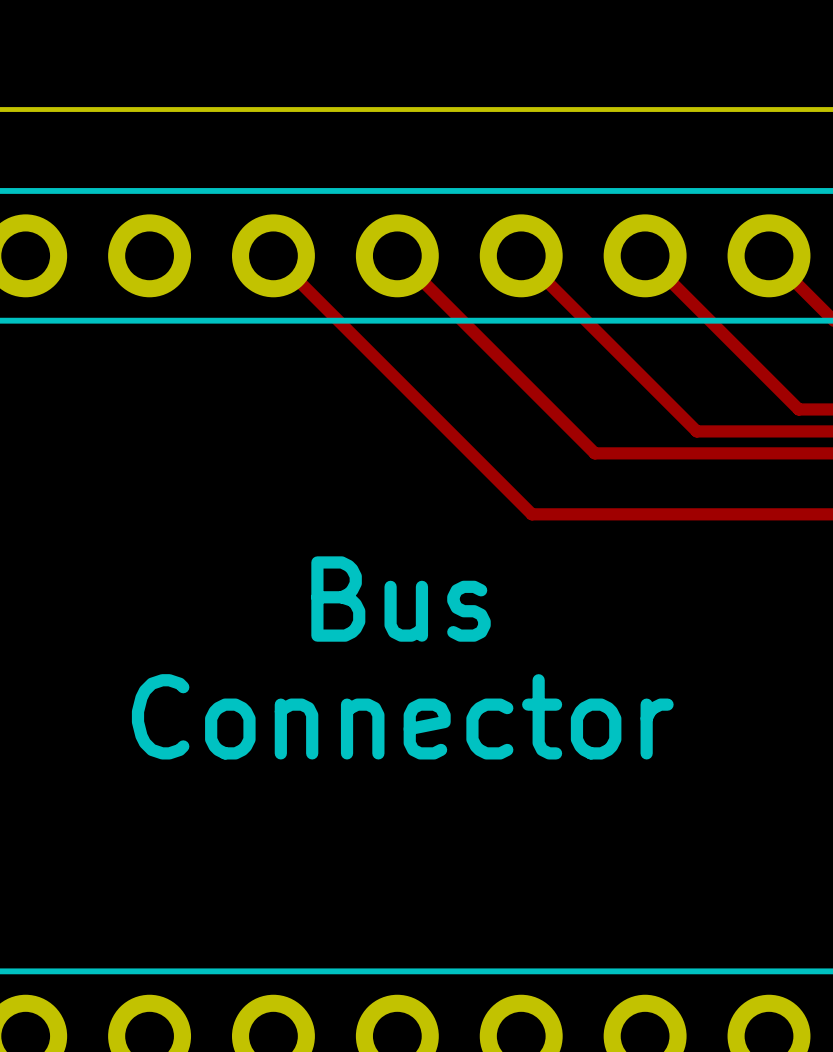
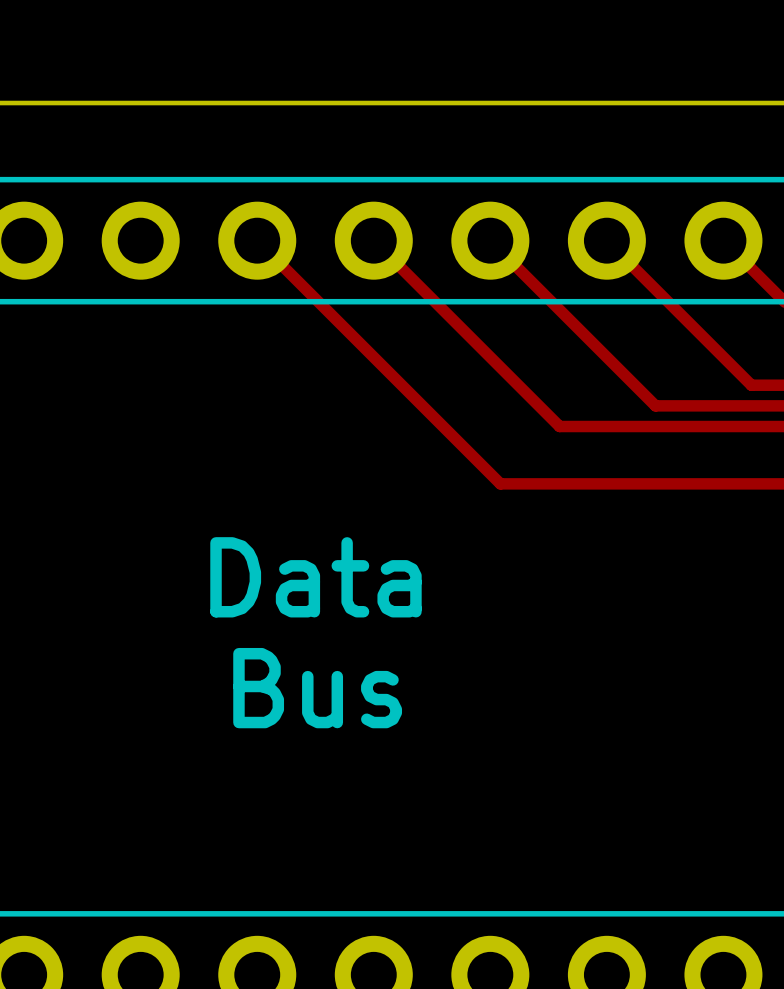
text position: Bus (401, 599) -> Bus (317, 688)
text: none -> Data (315, 577)
text: Connector (402, 716) -> none

